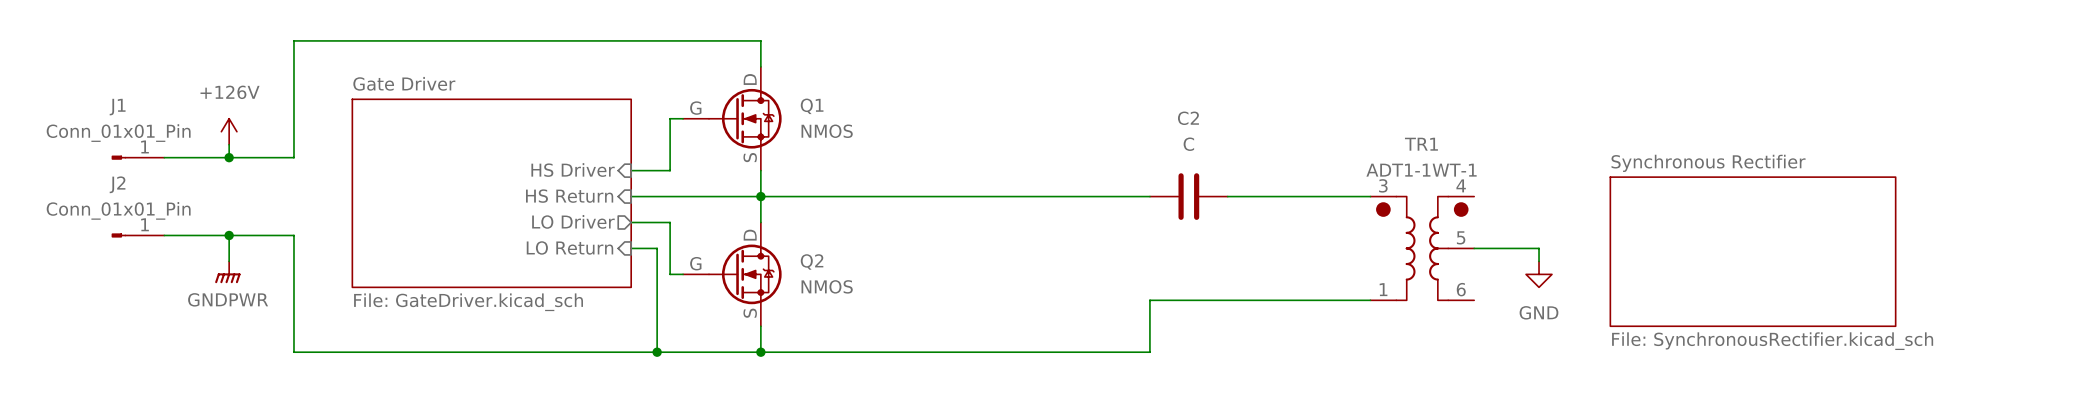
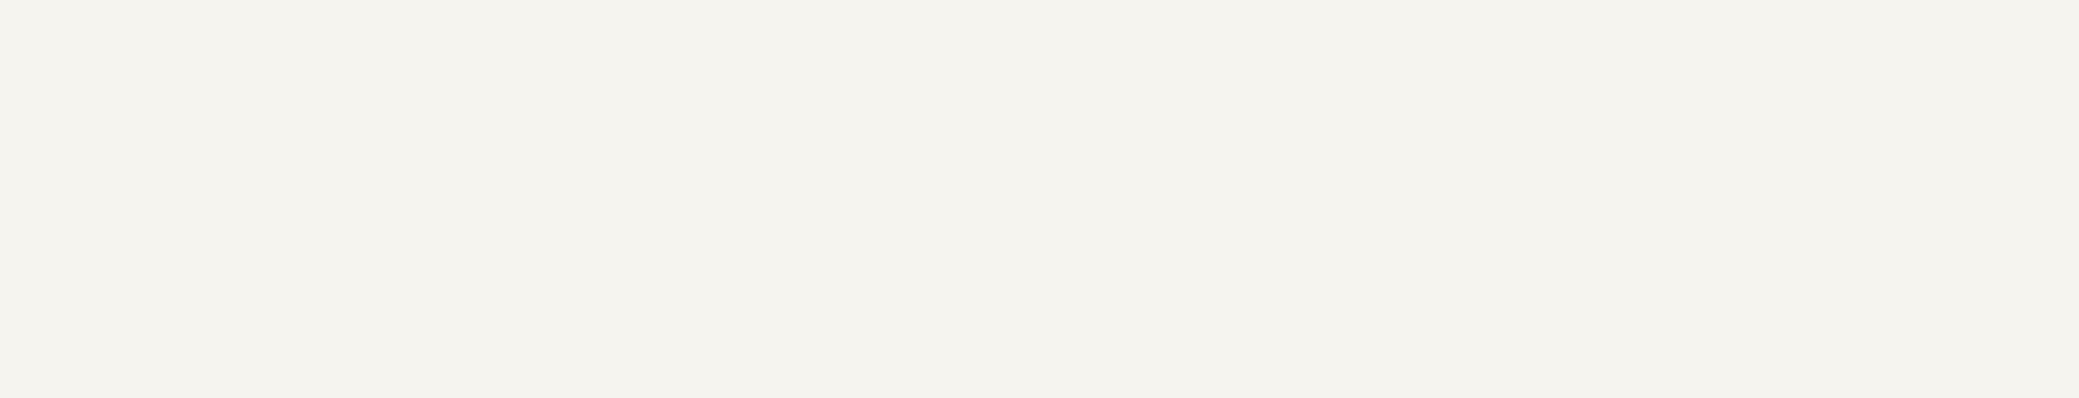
wire: (760, 66) (760, 40) (293, 40) (293, 157) (164, 157) -> none
wire: (683, 118) (670, 118) (670, 170) (631, 170) -> none
Q1: NMOS (732, 118) -> none
power symbol: +126V (229, 131) -> none
wire: (229, 144) (229, 157) -> none
J1: Conn_01x01_Pin (137, 157) -> none
junction: (229, 157) -> none
sheet pin: HS Driver (573, 170) -> none
wire: (760, 170) (760, 222) -> none
sheet Gate Driver: File: GateDriver.kicad_sch (491, 193) -> none
sheet pin: HS Return (569, 196) -> none
wire: (631, 196) (1149, 196) -> none
junction: (760, 196) -> none
C2: C (1188, 196) -> none
wire: (1227, 196) (1370, 196) -> none
sheet pin: LO Driver (573, 221) -> none
wire: (631, 222) (670, 222) (670, 274) (683, 274) -> none
J2: Conn_01x01_Pin (137, 235) -> none
wire: (164, 235) (293, 235) (293, 352) (1149, 352) (1149, 300) (1370, 300) -> none
wire: (229, 235) (229, 261) -> none
junction: (229, 235) -> none
sheet pin: LO Return (569, 247) -> none
wire: (631, 248) (657, 248) (657, 352) -> none
TR1: ADT1-1WT-1 (1422, 248) -> none
wire: (1474, 248) (1539, 248) (1539, 261) -> none
sheet Synchronous Rectifier: File: SynchronousRectifier.kicad_sch (1753, 251) -> none
power symbol: GNDPWR (227, 272) -> none
Q2: NMOS (732, 274) -> none
power symbol: GND (1539, 274) -> none
wire: (760, 326) (760, 352) -> none
junction: (657, 352) -> none
junction: (760, 352) -> none

